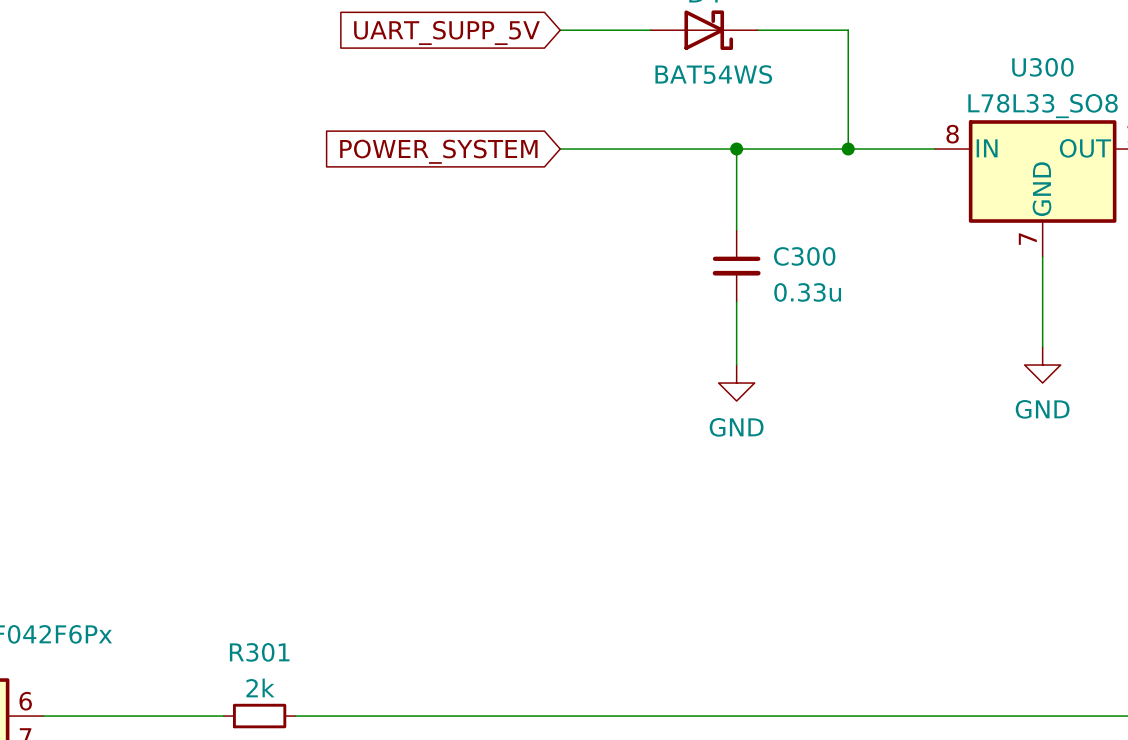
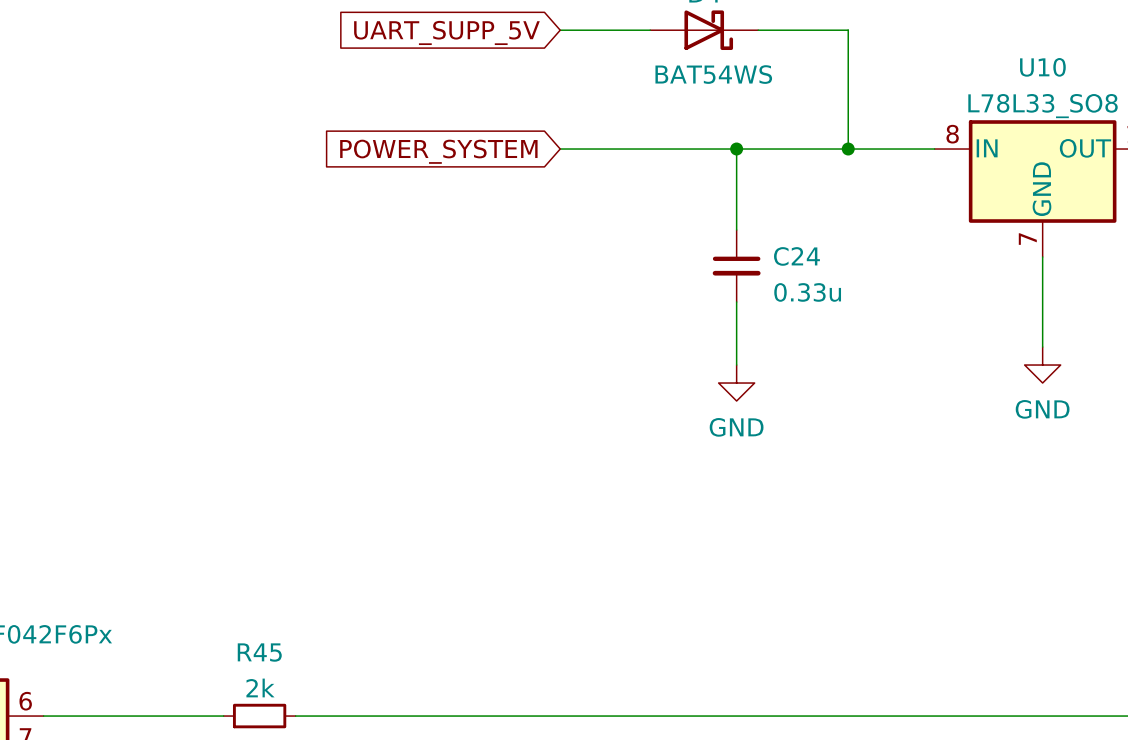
U300 name: U300 (1042, 67) -> U10 (1042, 67)
C300 name: C300 (804, 256) -> C24 (796, 256)
R301 name: R301 (259, 652) -> R45 (259, 652)

